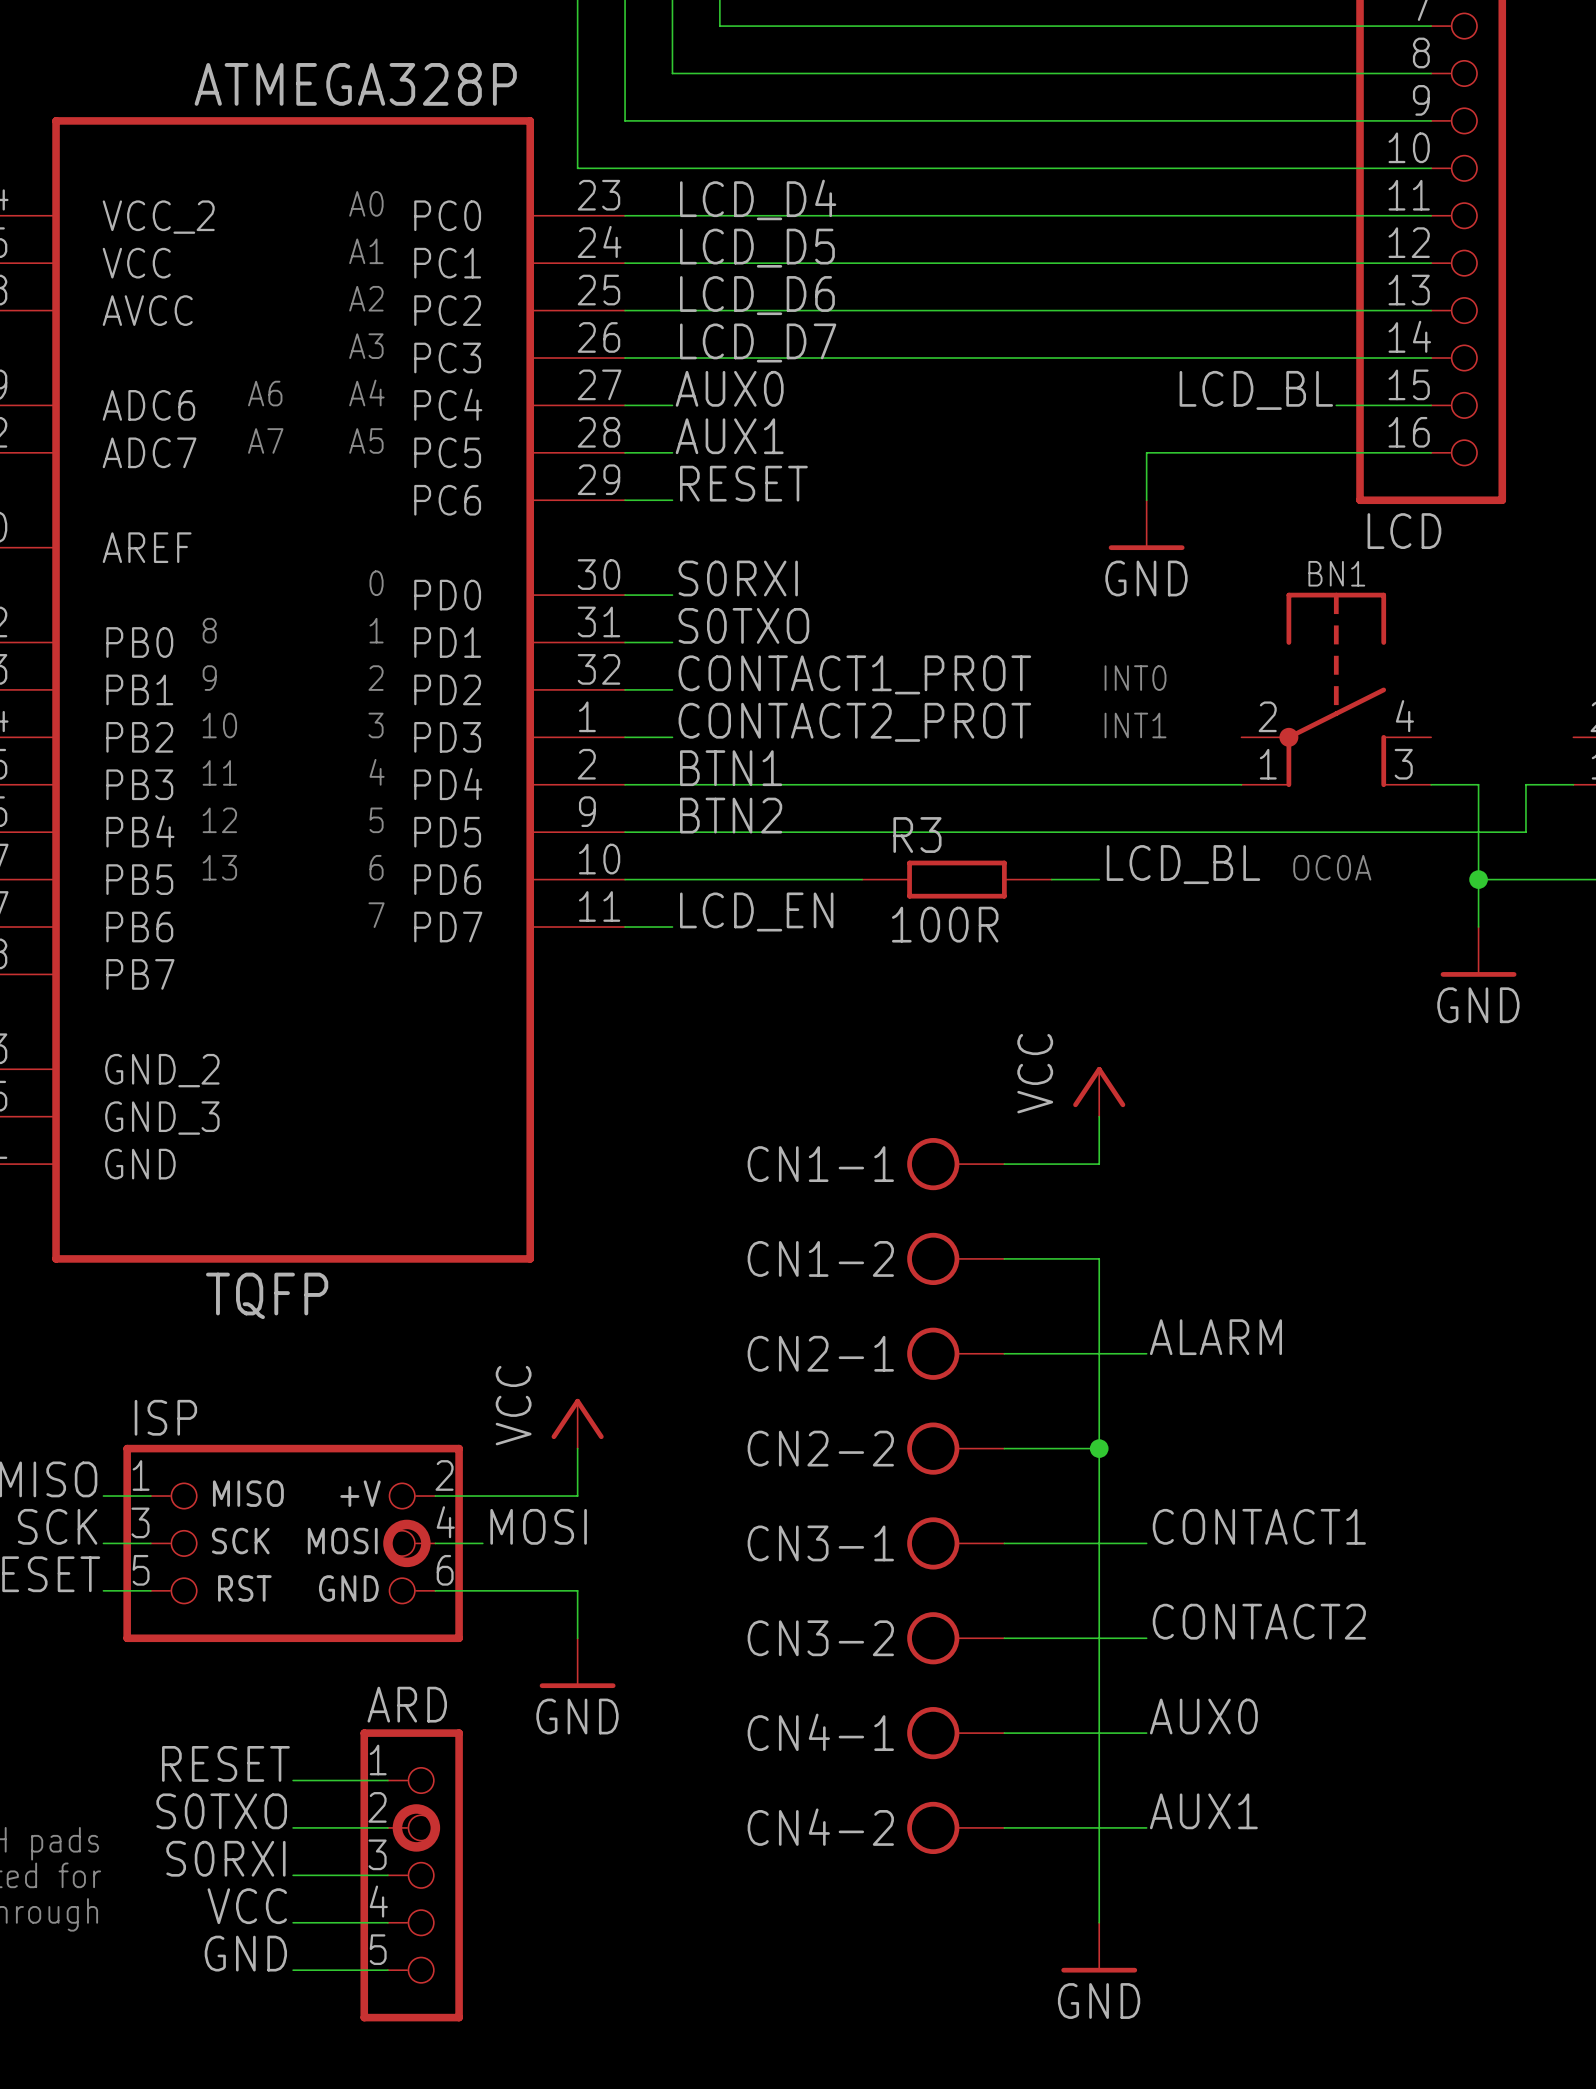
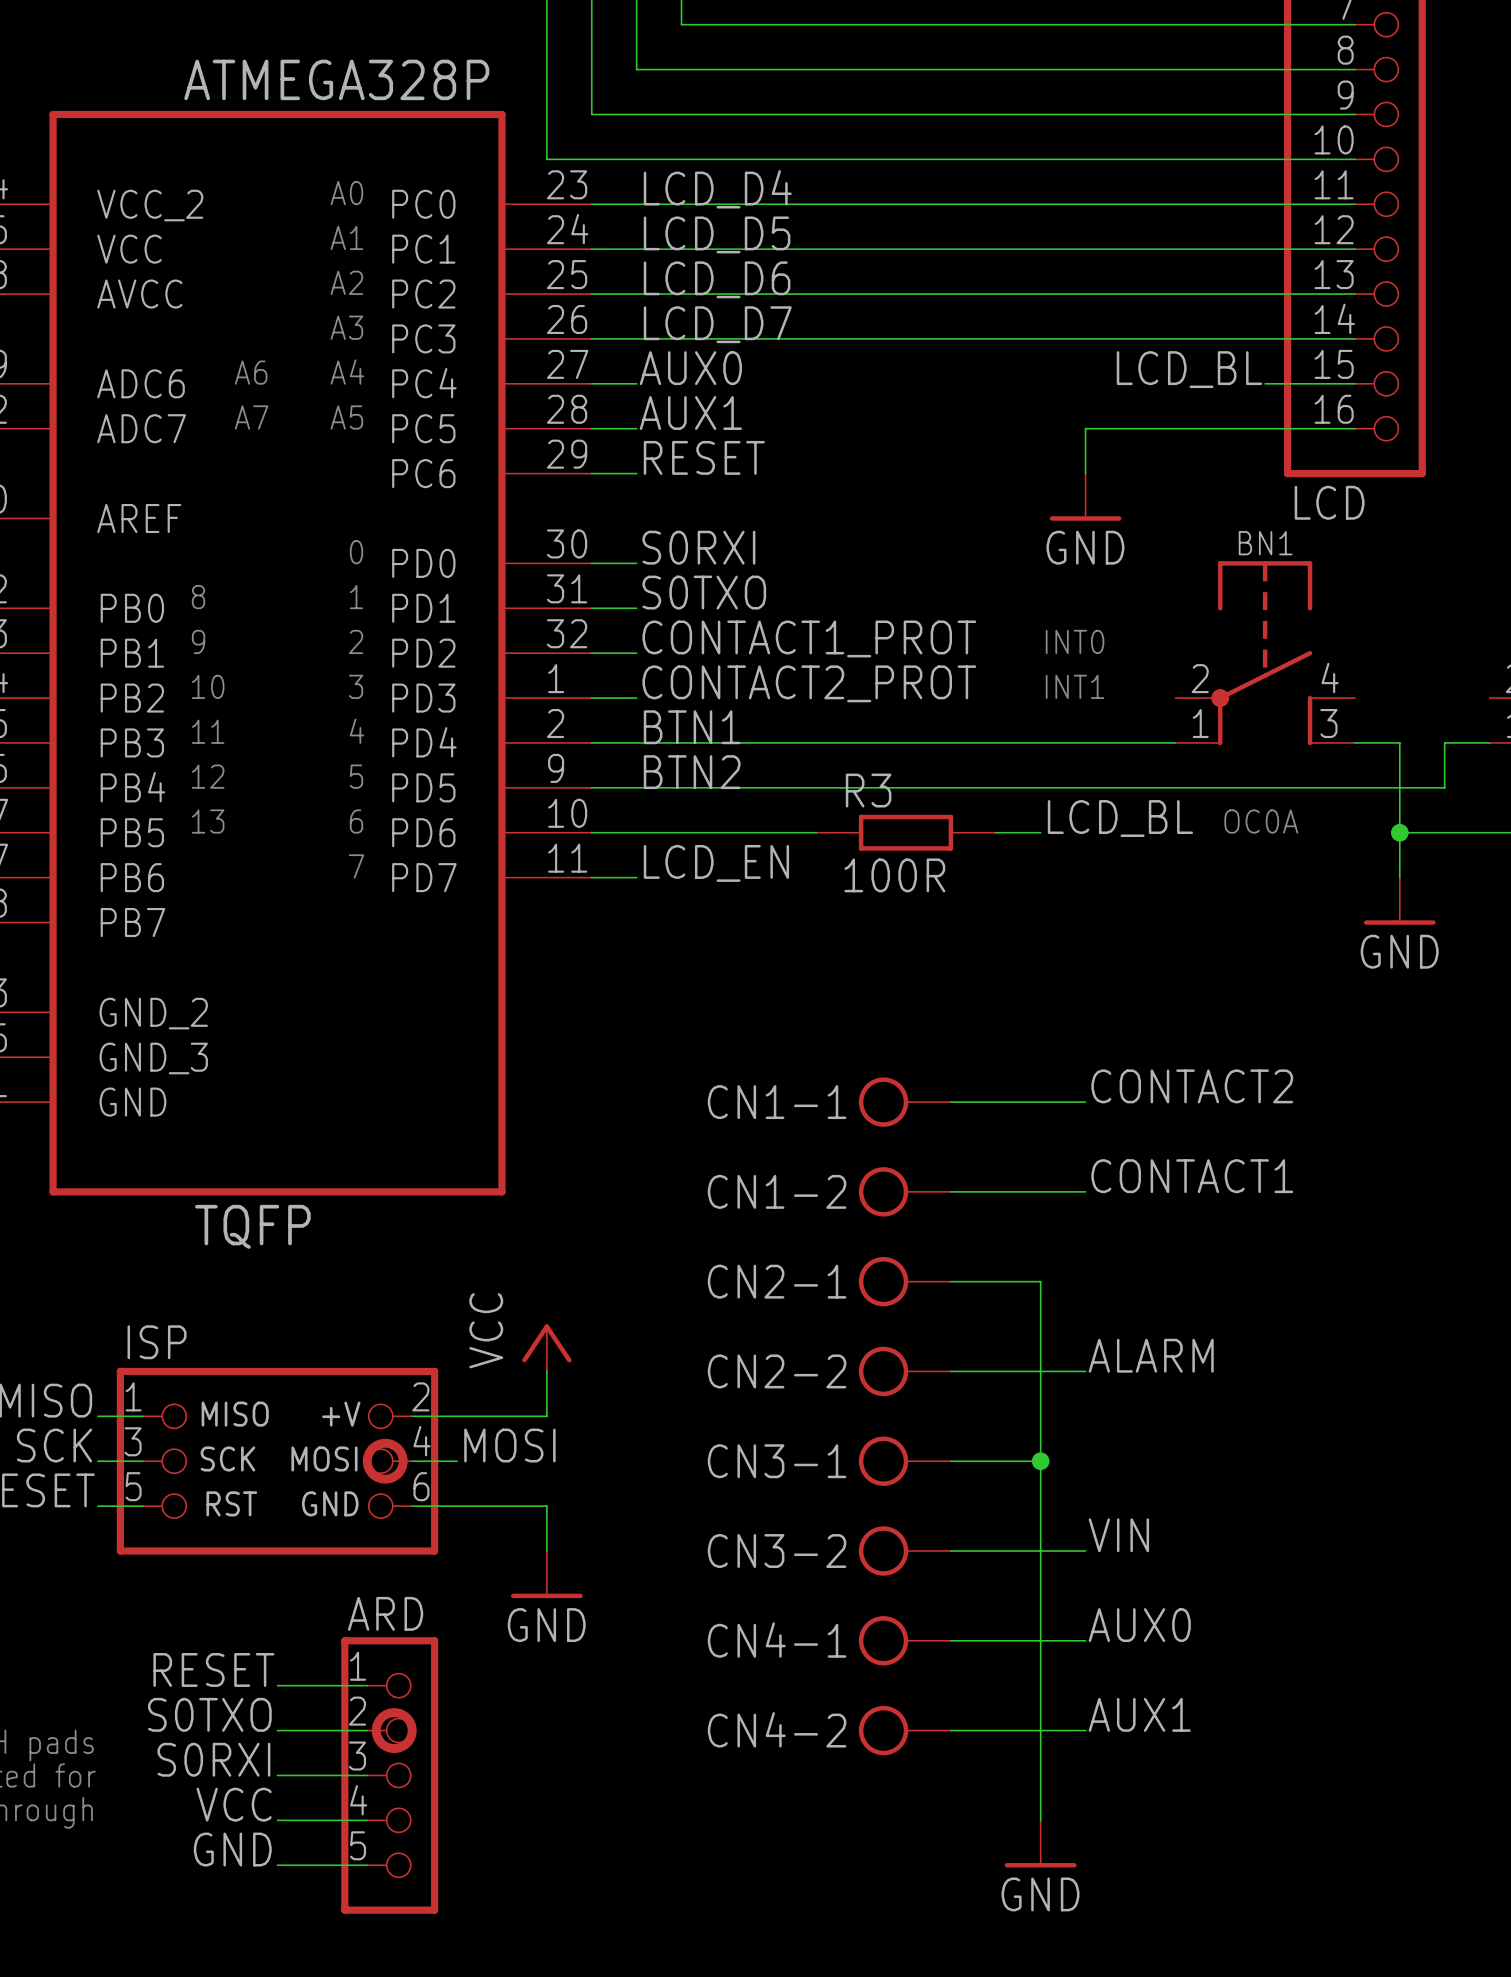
power symbol: VCC (1099, 1091) -> none
wire: (1099, 1116) (1099, 1164) -> (1085, 1102) (1040, 1102)
label: none -> CONTACT2 (1192, 1086)
wire: (1099, 1258) (1099, 1353) (1146, 1353) -> (1040, 1191) (1085, 1191)
label position: ALARM (1215, 1337) -> ALARM (1151, 1355)
junction position: (1099, 1448) -> (1040, 1461)
label position: CONTACT1 (1259, 1526) -> CONTACT1 (1192, 1176)
wire: (1099, 1543) (1146, 1543) -> (1040, 1371) (1085, 1371)
label: CONTACT2 (1259, 1621) -> VIN (1118, 1535)

